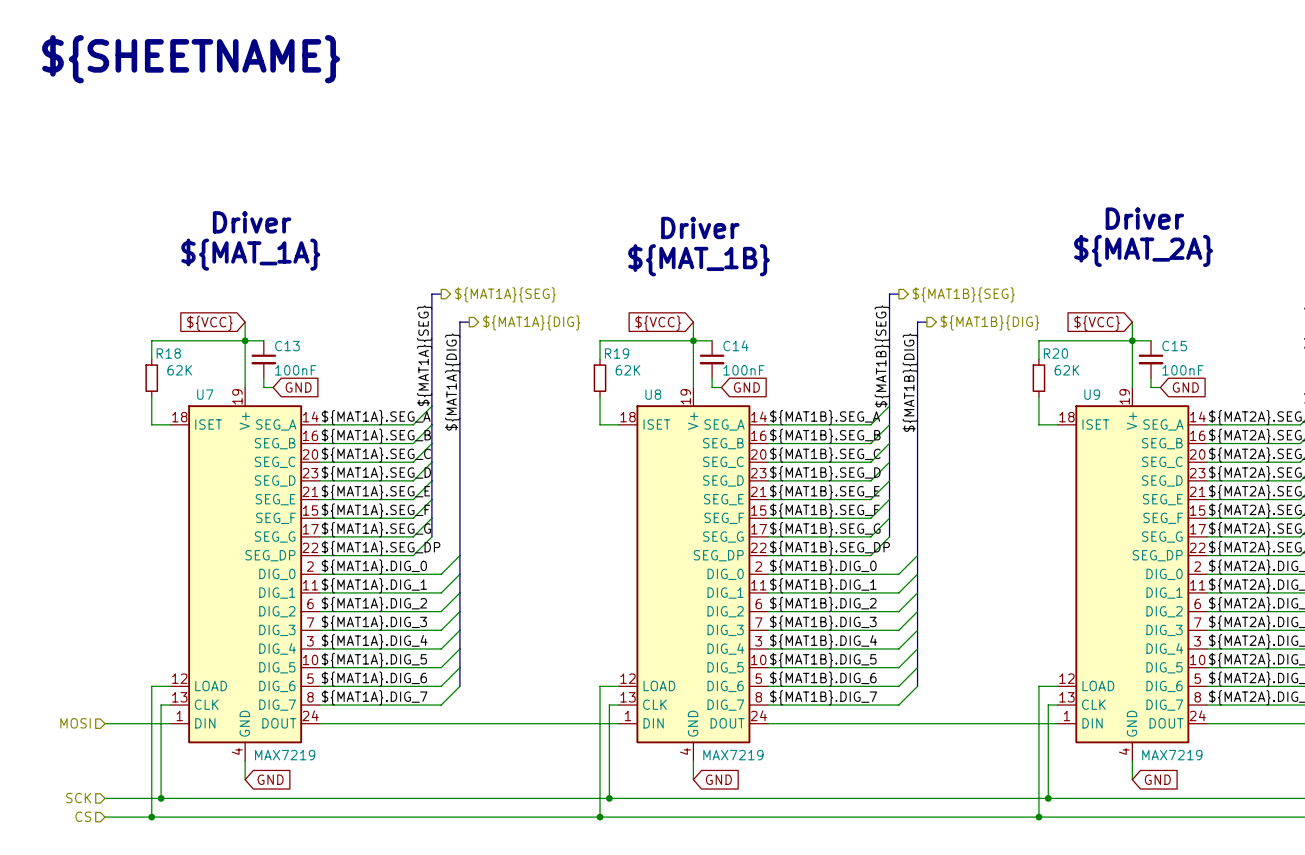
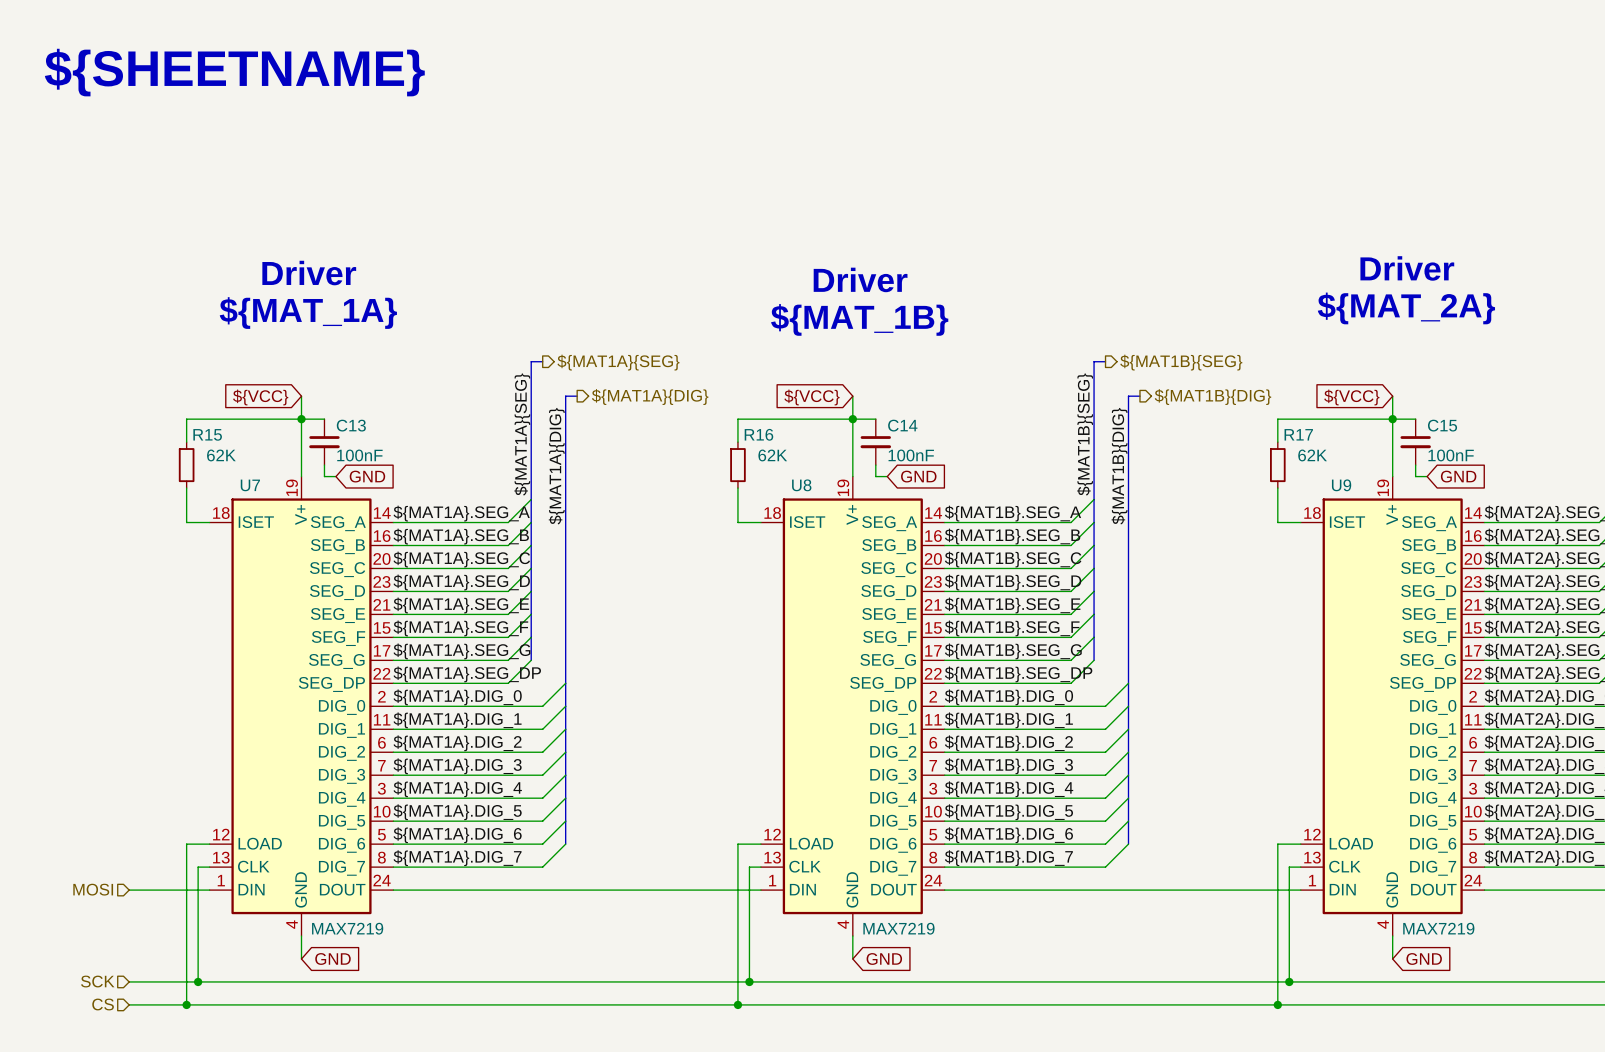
R18 name: R18 (168, 353) -> R15 (207, 434)
R19 name: R19 (617, 353) -> R16 (758, 434)
R20 name: R20 (1055, 353) -> R17 (1298, 434)

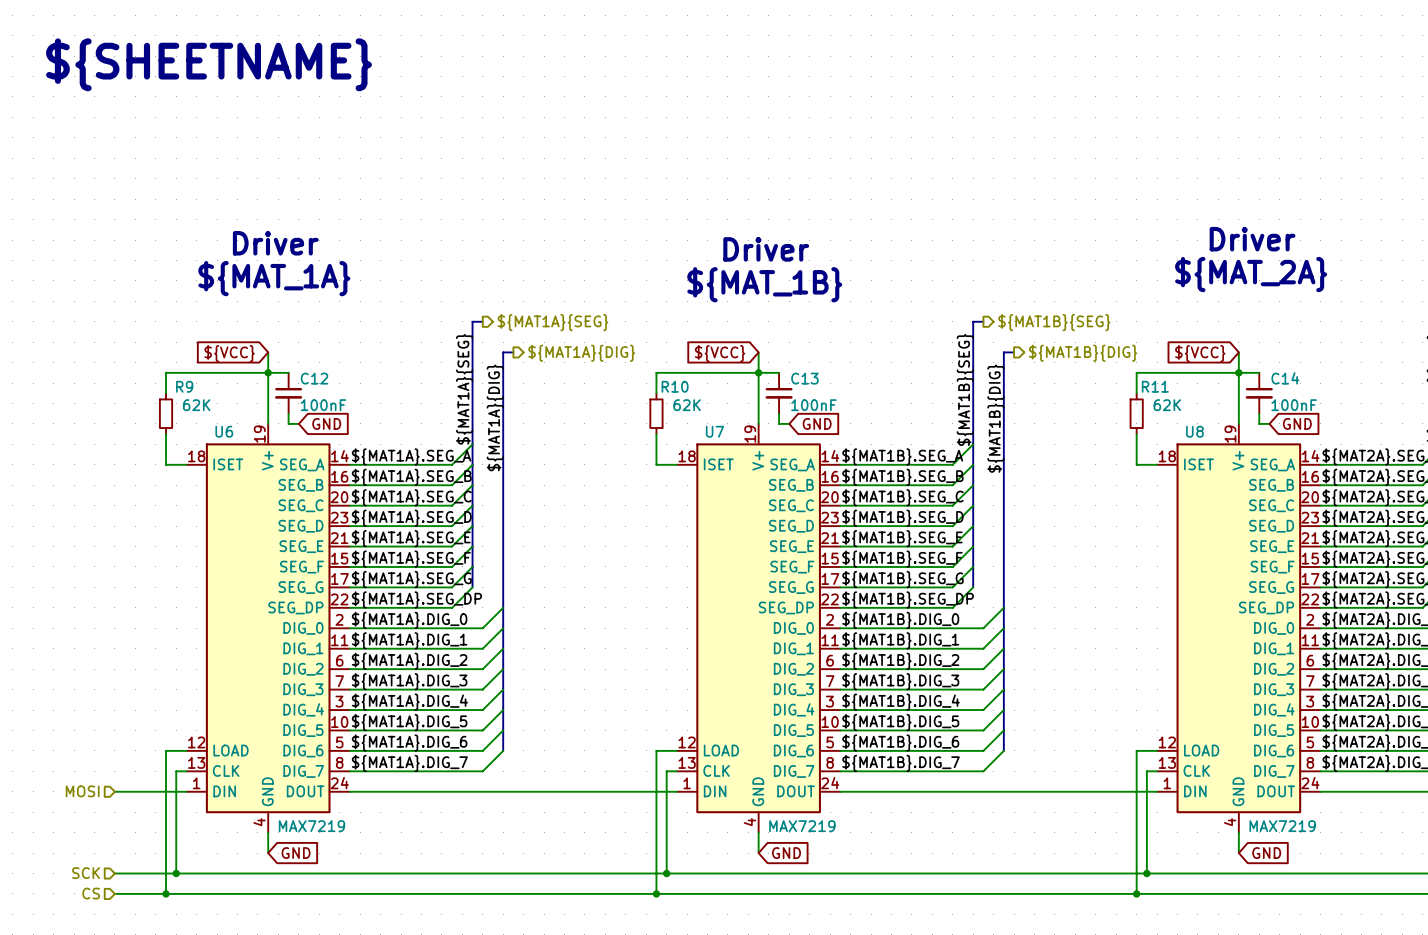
C13 name: C13 (351, 425) -> C12 (314, 378)
C14 name: C14 (902, 425) -> C13 (804, 378)
C15 name: C15 (1442, 425) -> C14 (1285, 378)
R15 name: R15 (207, 434) -> R9 (184, 386)
R16 name: R16 (758, 434) -> R10 (675, 386)
R17 name: R17 (1298, 434) -> R11 (1155, 386)
U7 name: U7 (250, 485) -> U6 (224, 431)
U8 name: U8 (801, 485) -> U7 (714, 431)
U9 name: U9 (1341, 485) -> U8 (1194, 431)

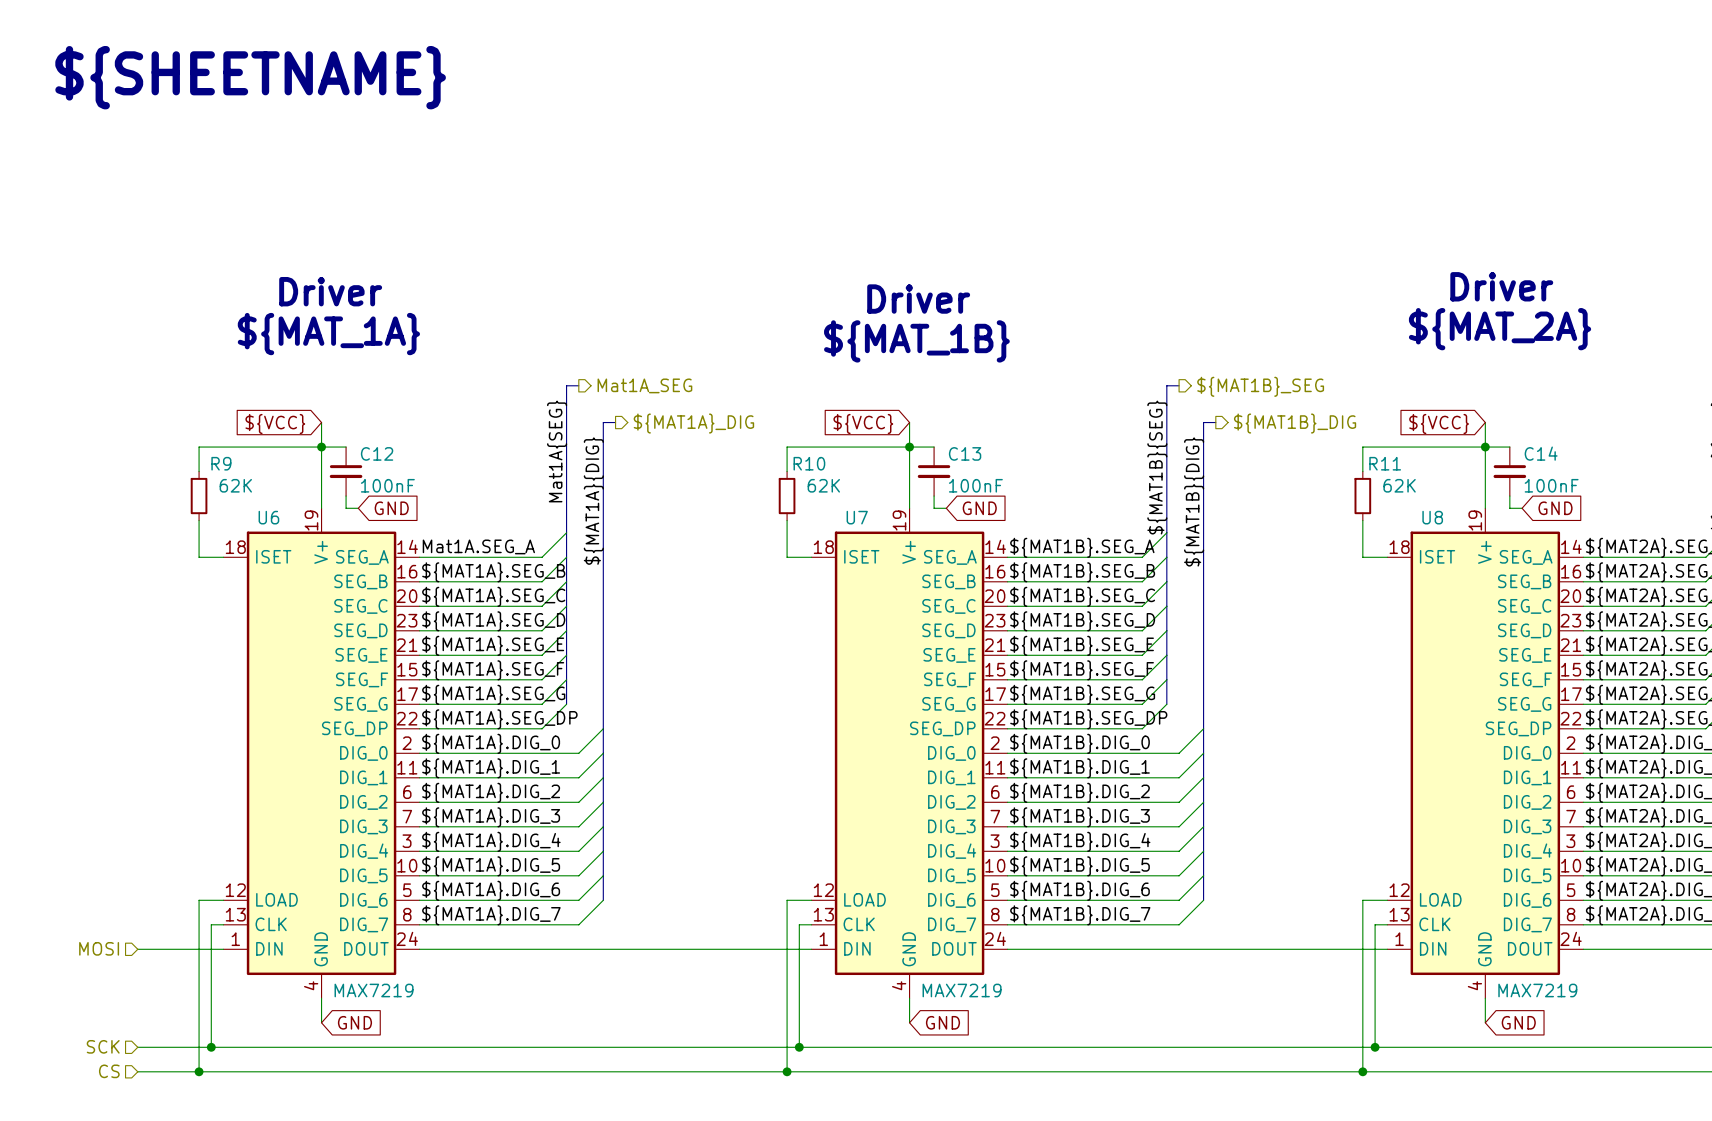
hierarchical label: ${MAT1A}{SEG} (552, 322) -> Mat1A_SEG (644, 385)
hierarchical label: ${MAT1B}{SEG} (1054, 322) -> ${MAT1B}_SEG (1260, 386)
hierarchical label: ${MAT1A}{DIG} (581, 353) -> ${MAT1A}_DIG (693, 423)
hierarchical label: ${MAT1B}{DIG} (1083, 353) -> ${MAT1B}_DIG (1295, 423)
label: ${MAT1A}{SEG} (464, 389) -> Mat1A{SEG} (557, 451)
label: ${MAT1A}.SEG_A (411, 456) -> Mat1A.SEG_A (478, 546)

